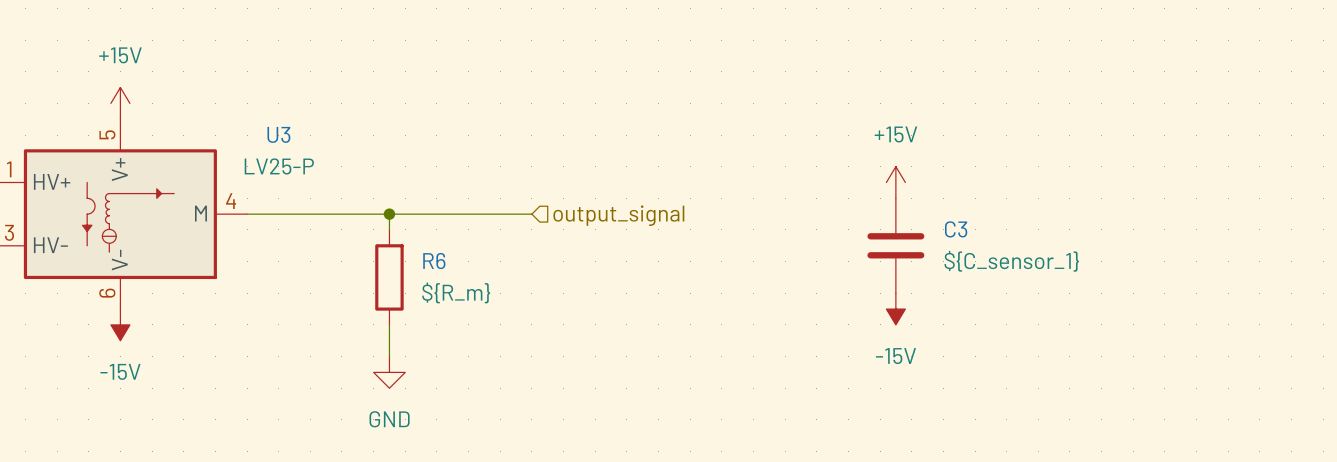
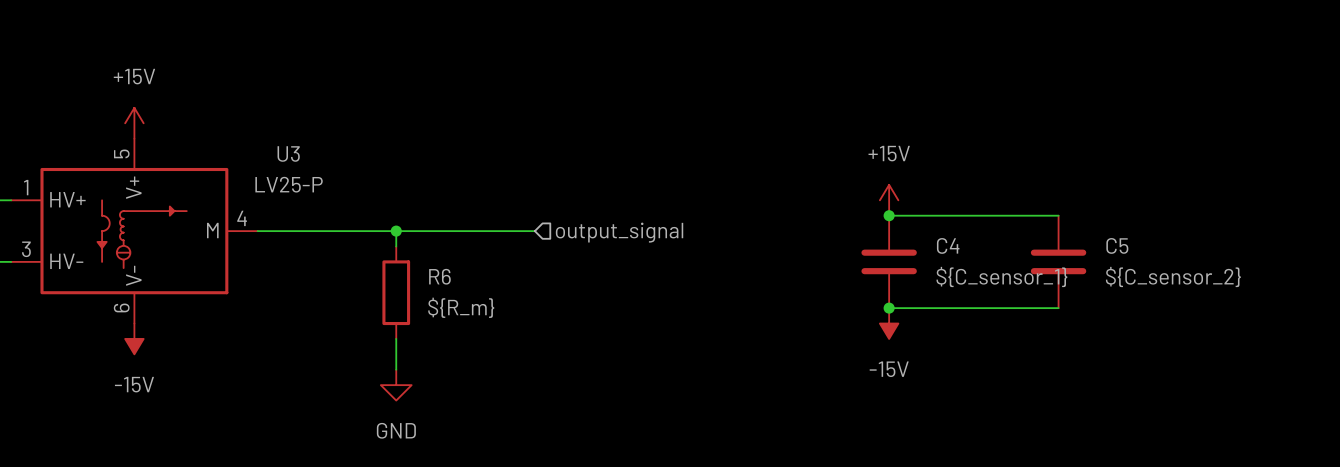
wire: none -> (889, 215) (1058, 215)
junction: none -> (889, 215)
C3 name: C3 (956, 229) -> C4 (948, 245)
C5: none -> ${C_sensor_2} (1058, 261)
wire: none -> (889, 308) (1058, 308)
junction: none -> (889, 308)

